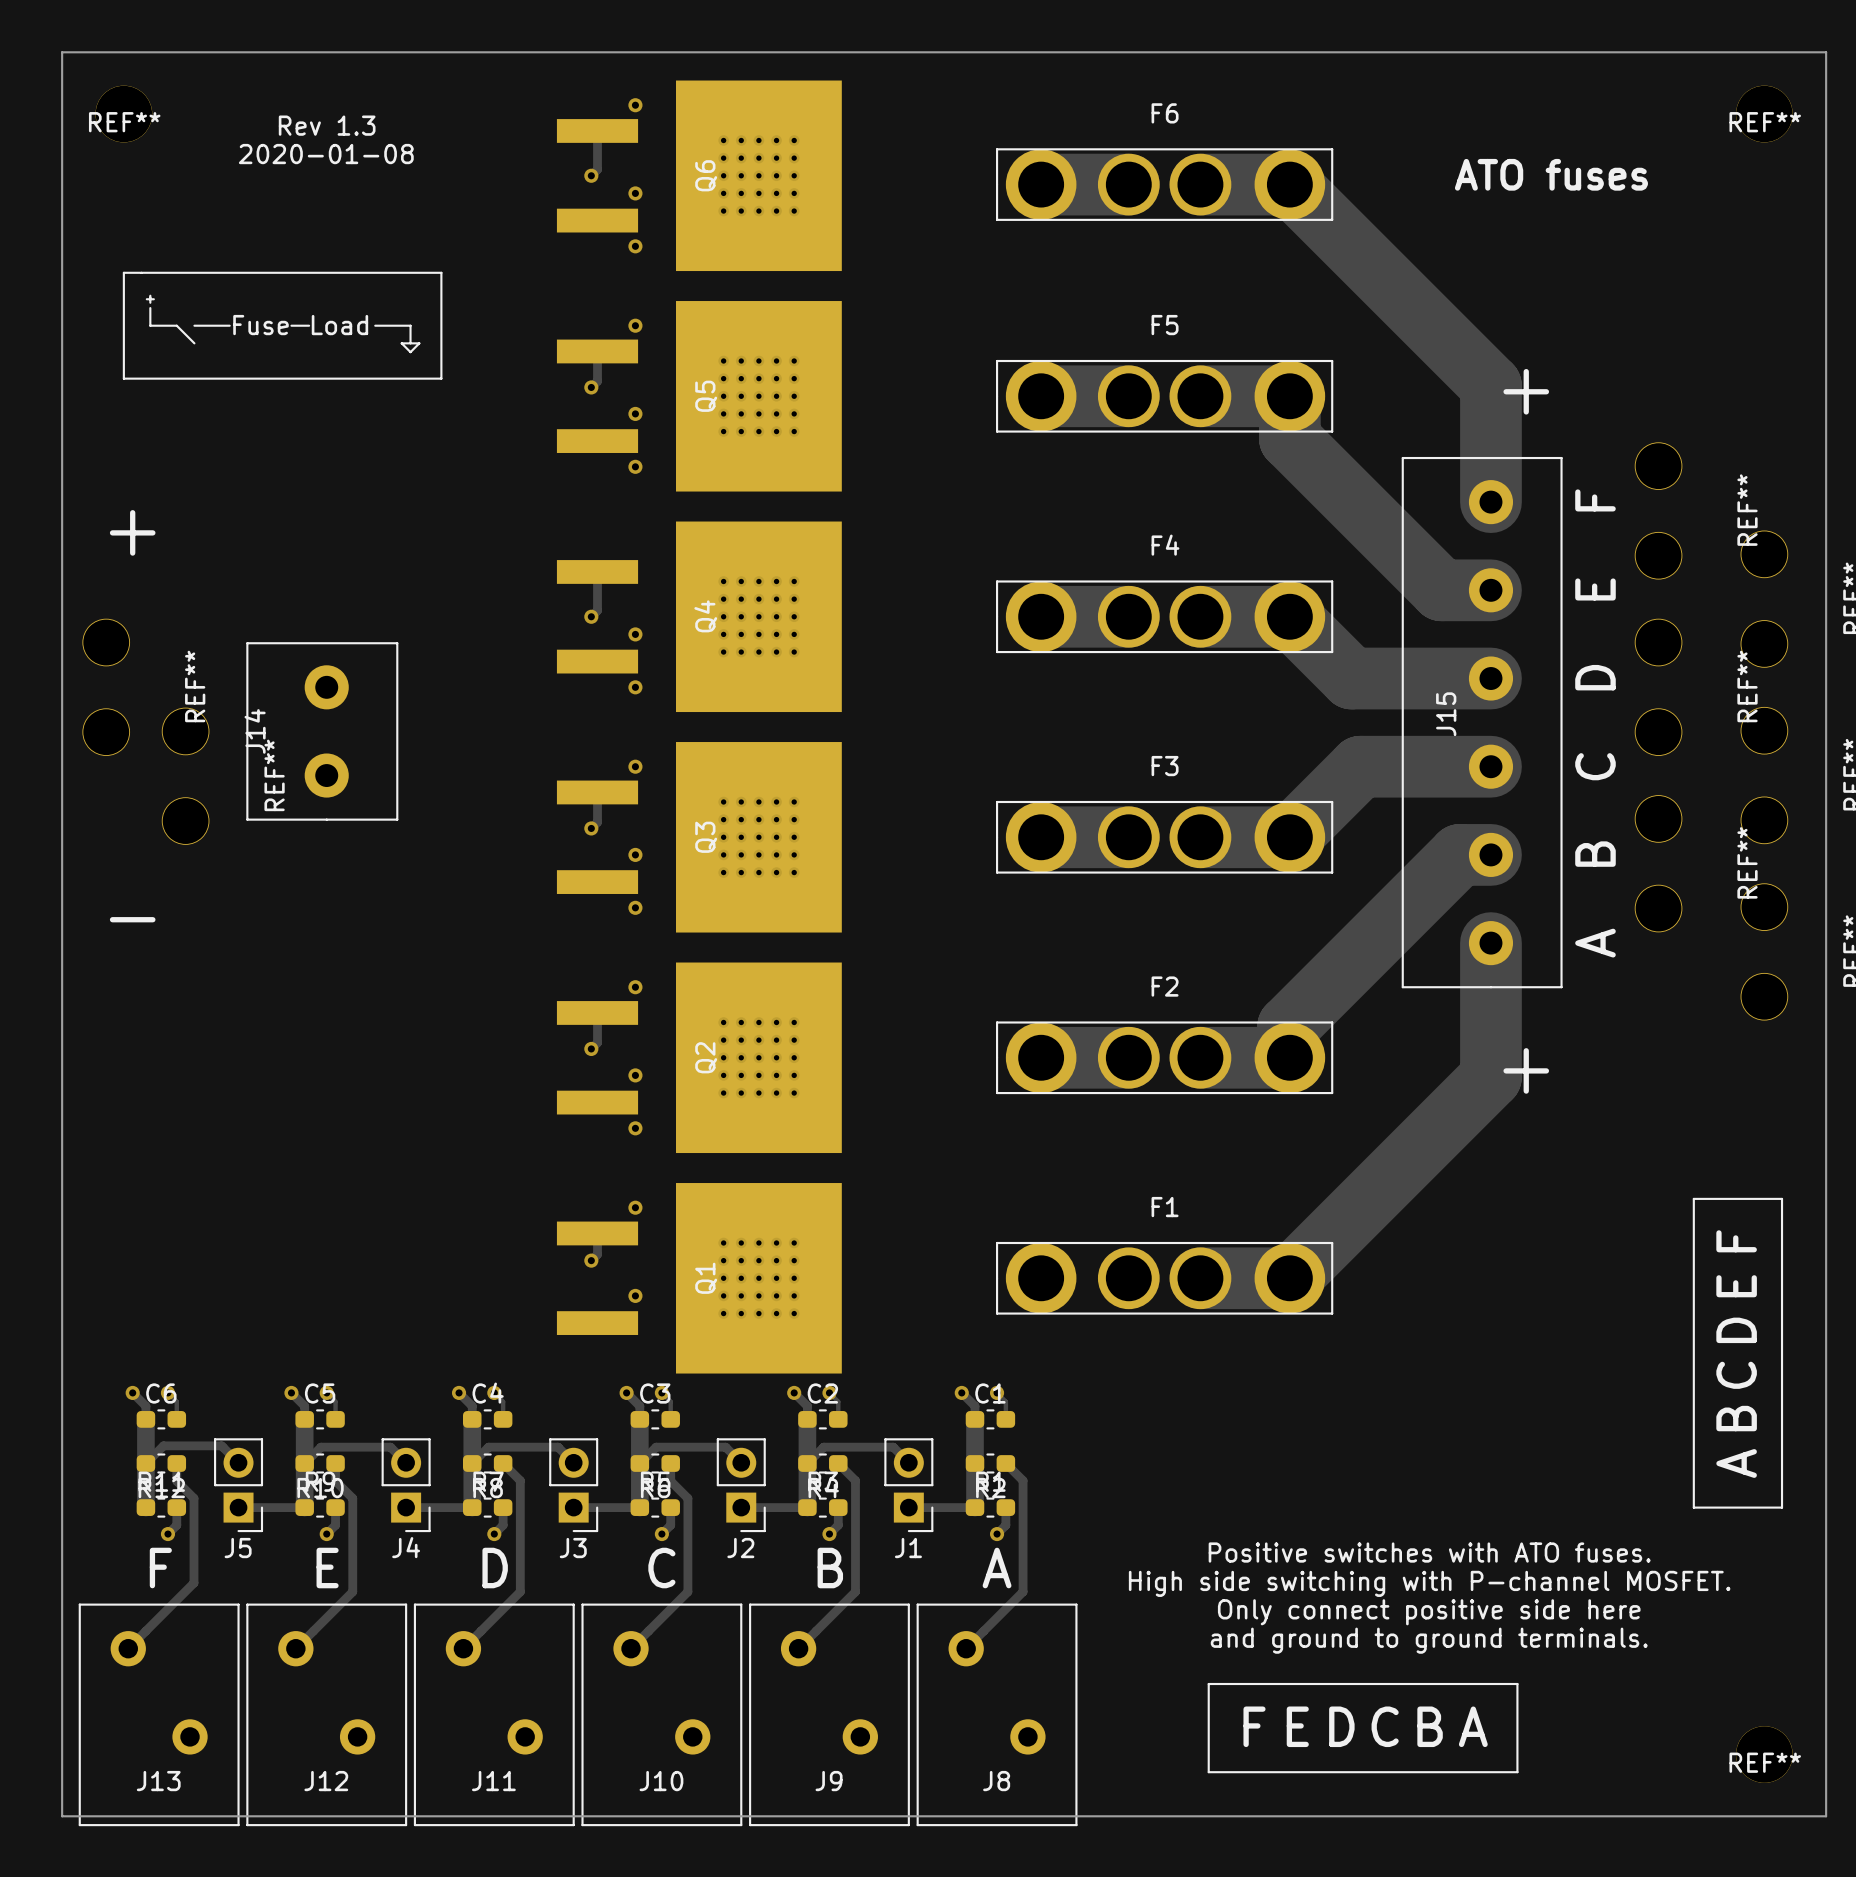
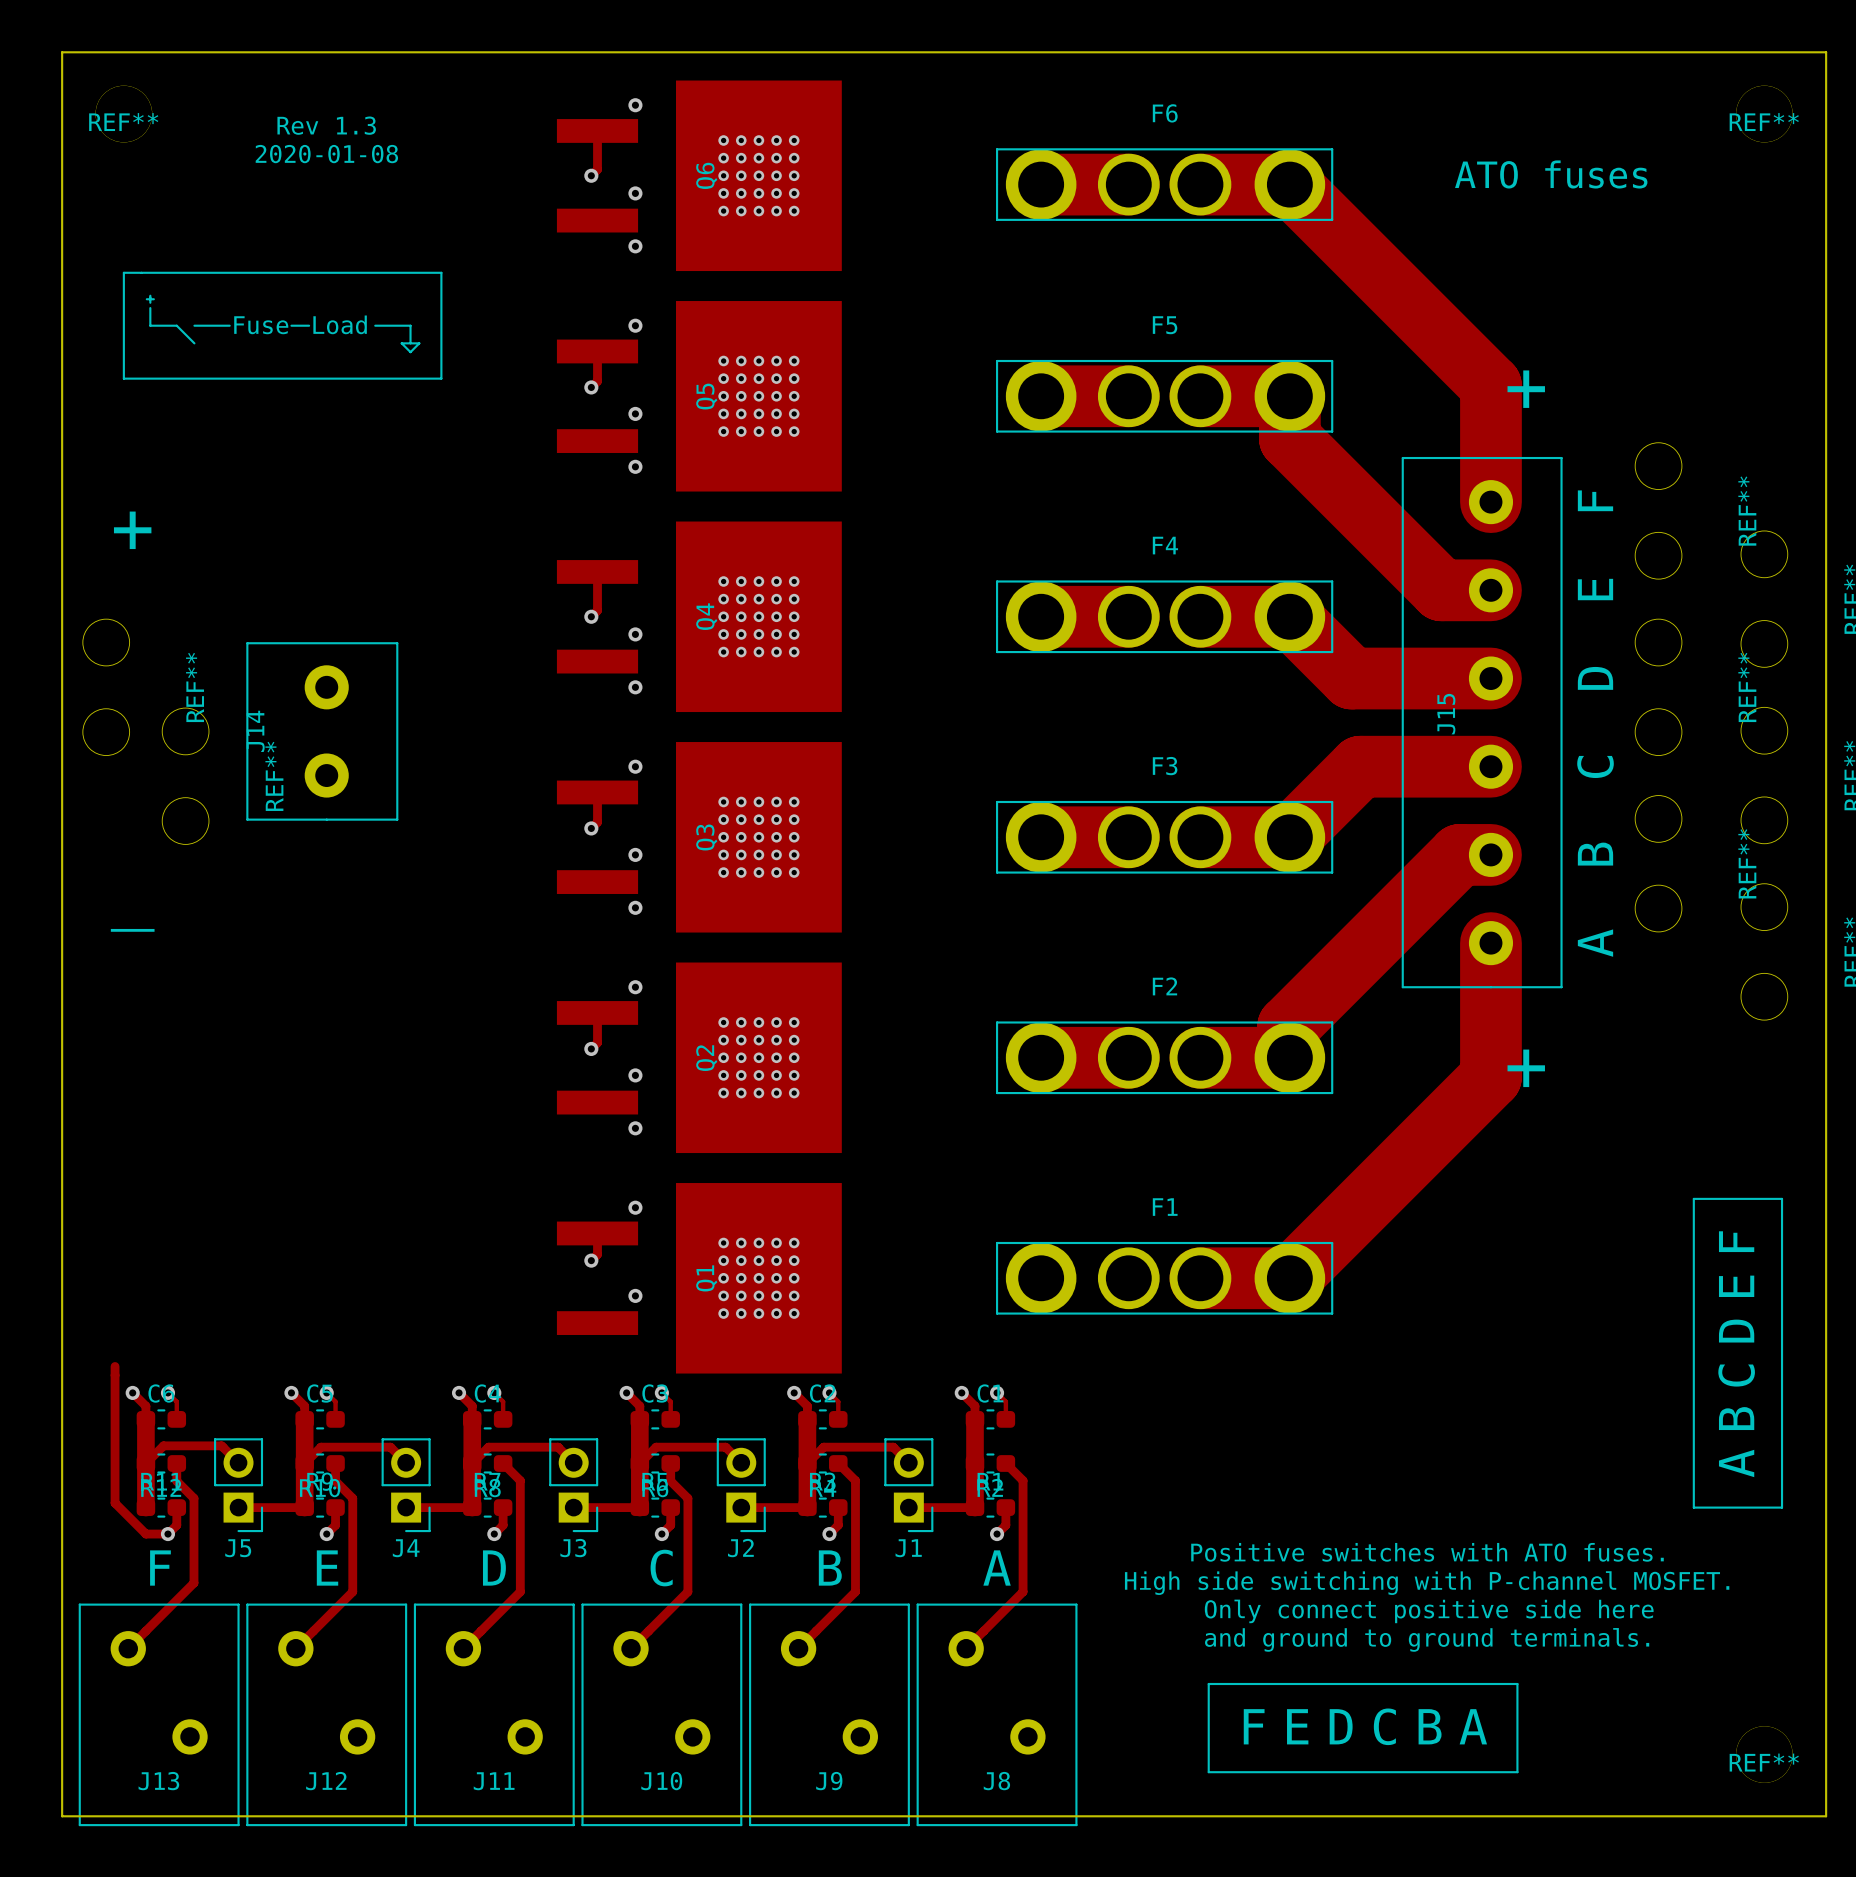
track: none -> (115, 1366) (115, 1503) (145, 1534) (167, 1534)

